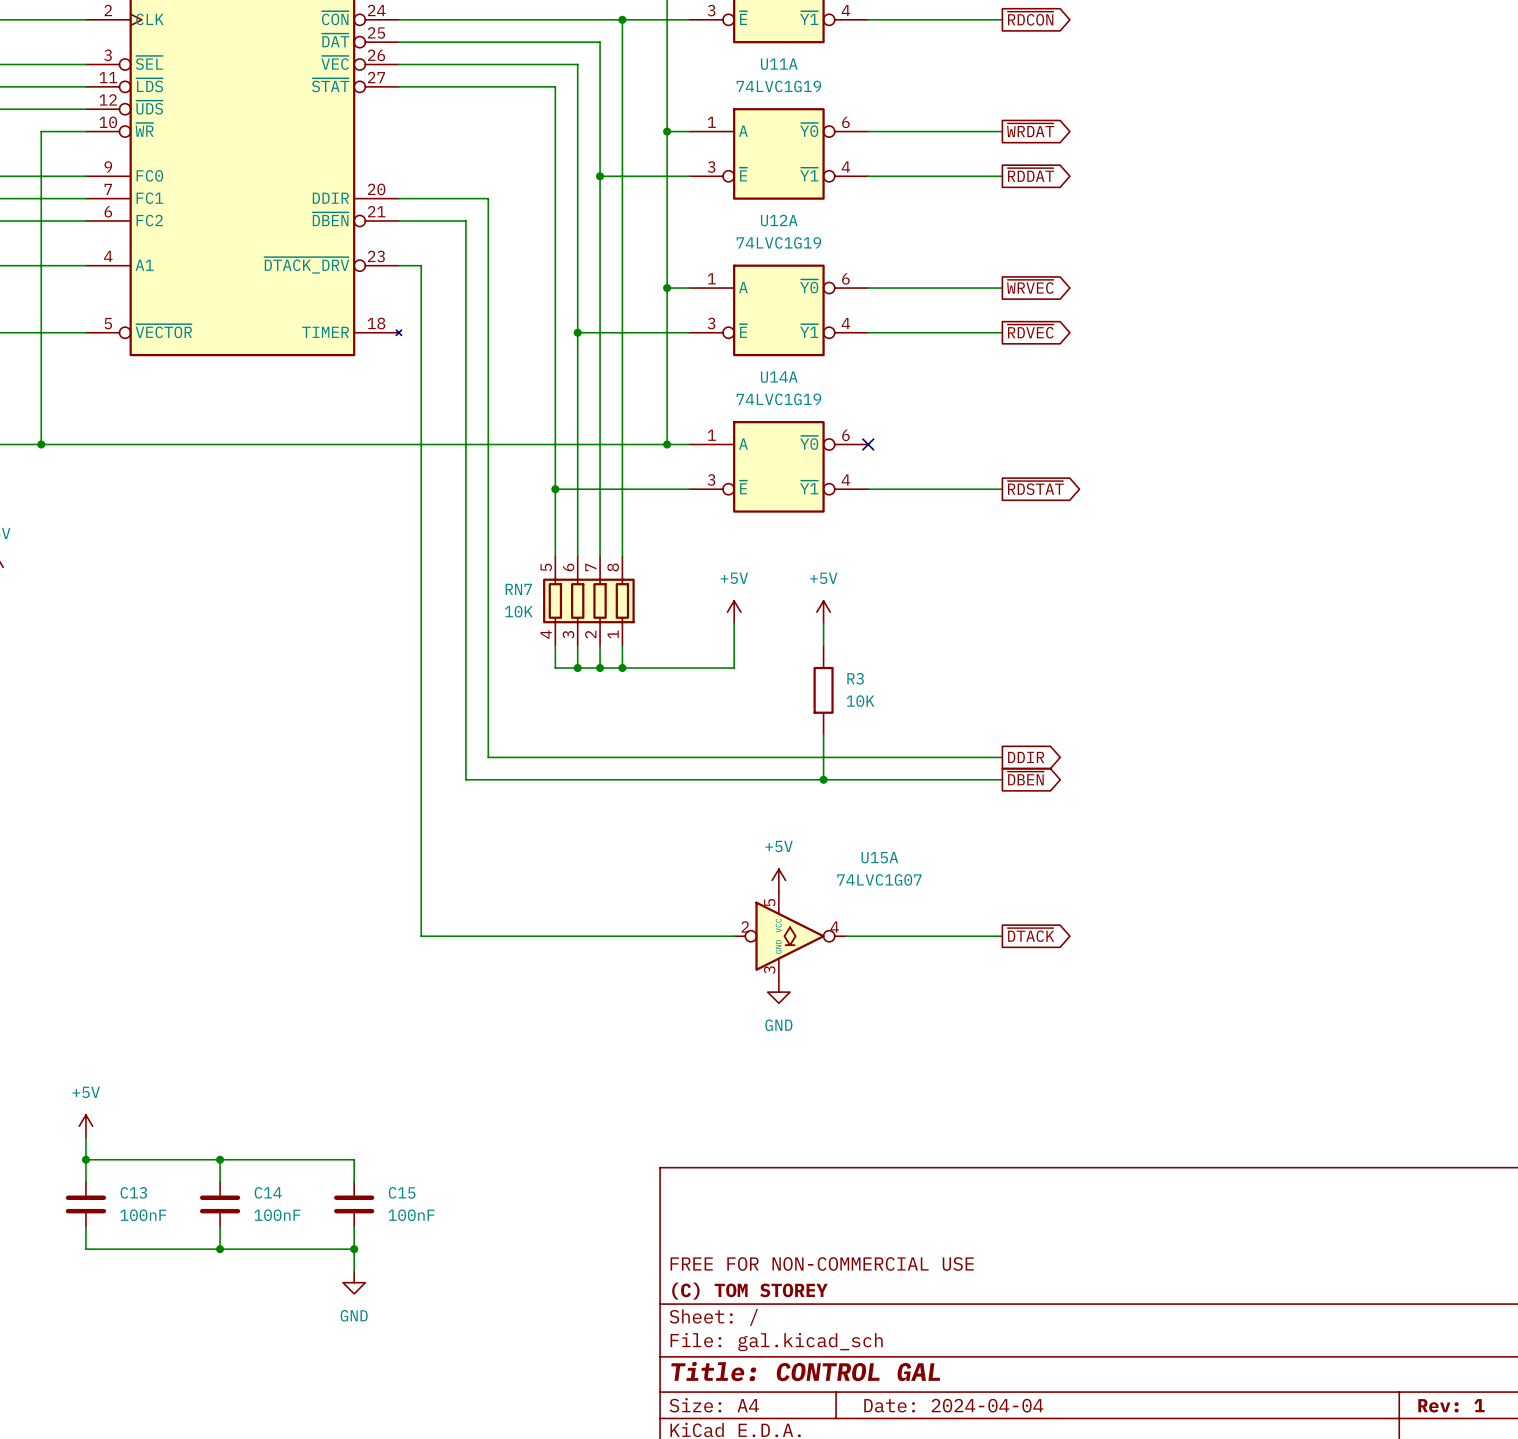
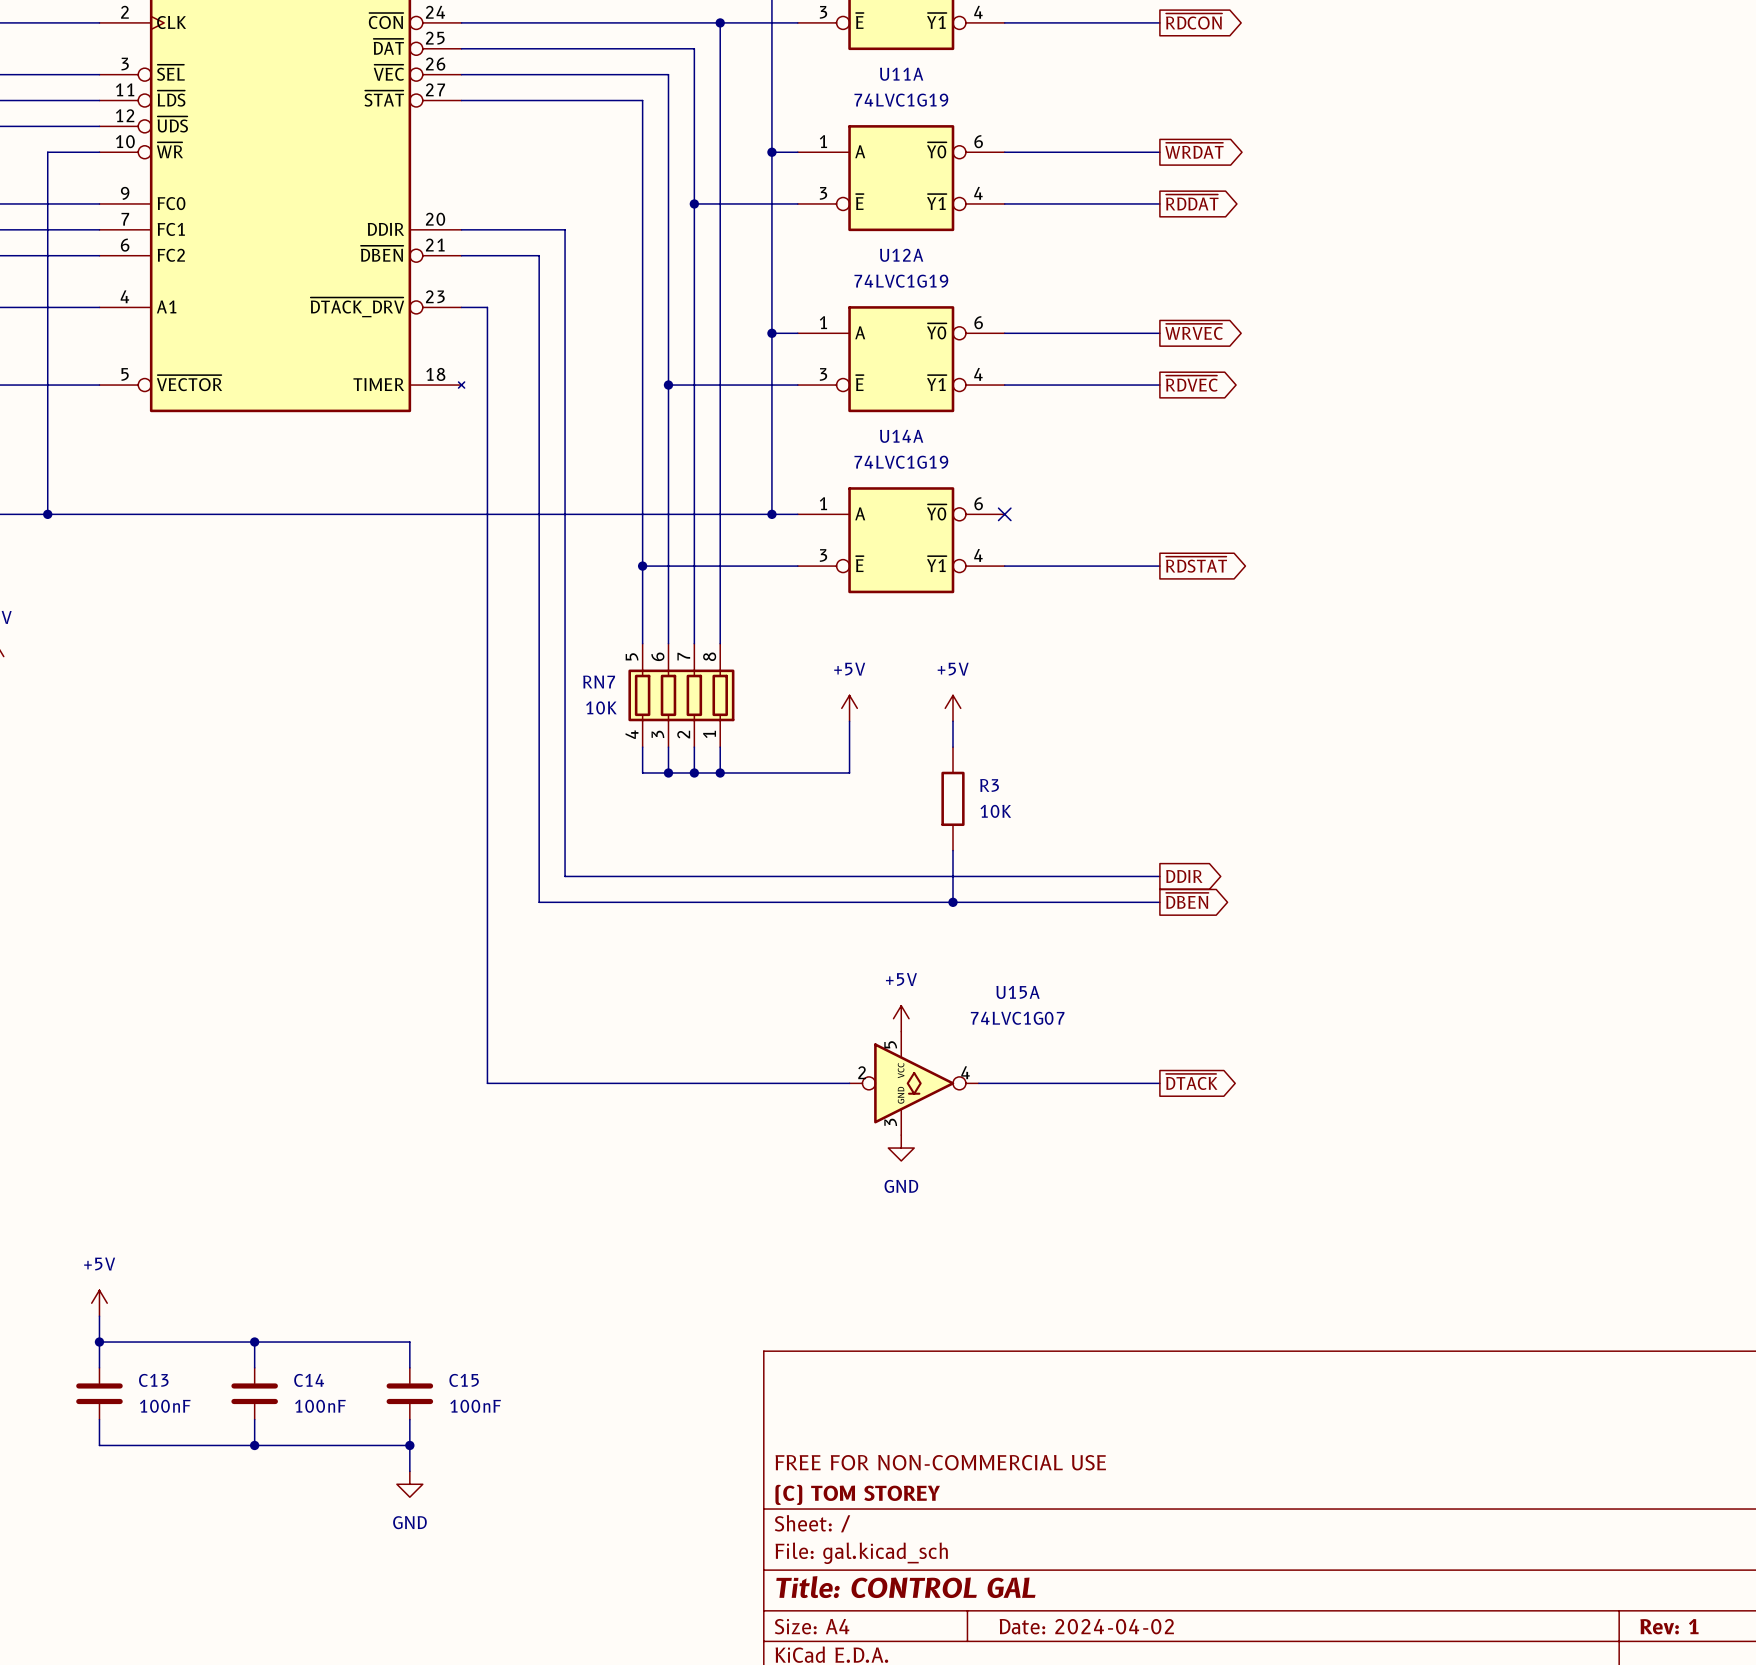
title block: Date: 2024-04-04 (953, 1405) -> Date: 2024-04-02 (1086, 1626)

